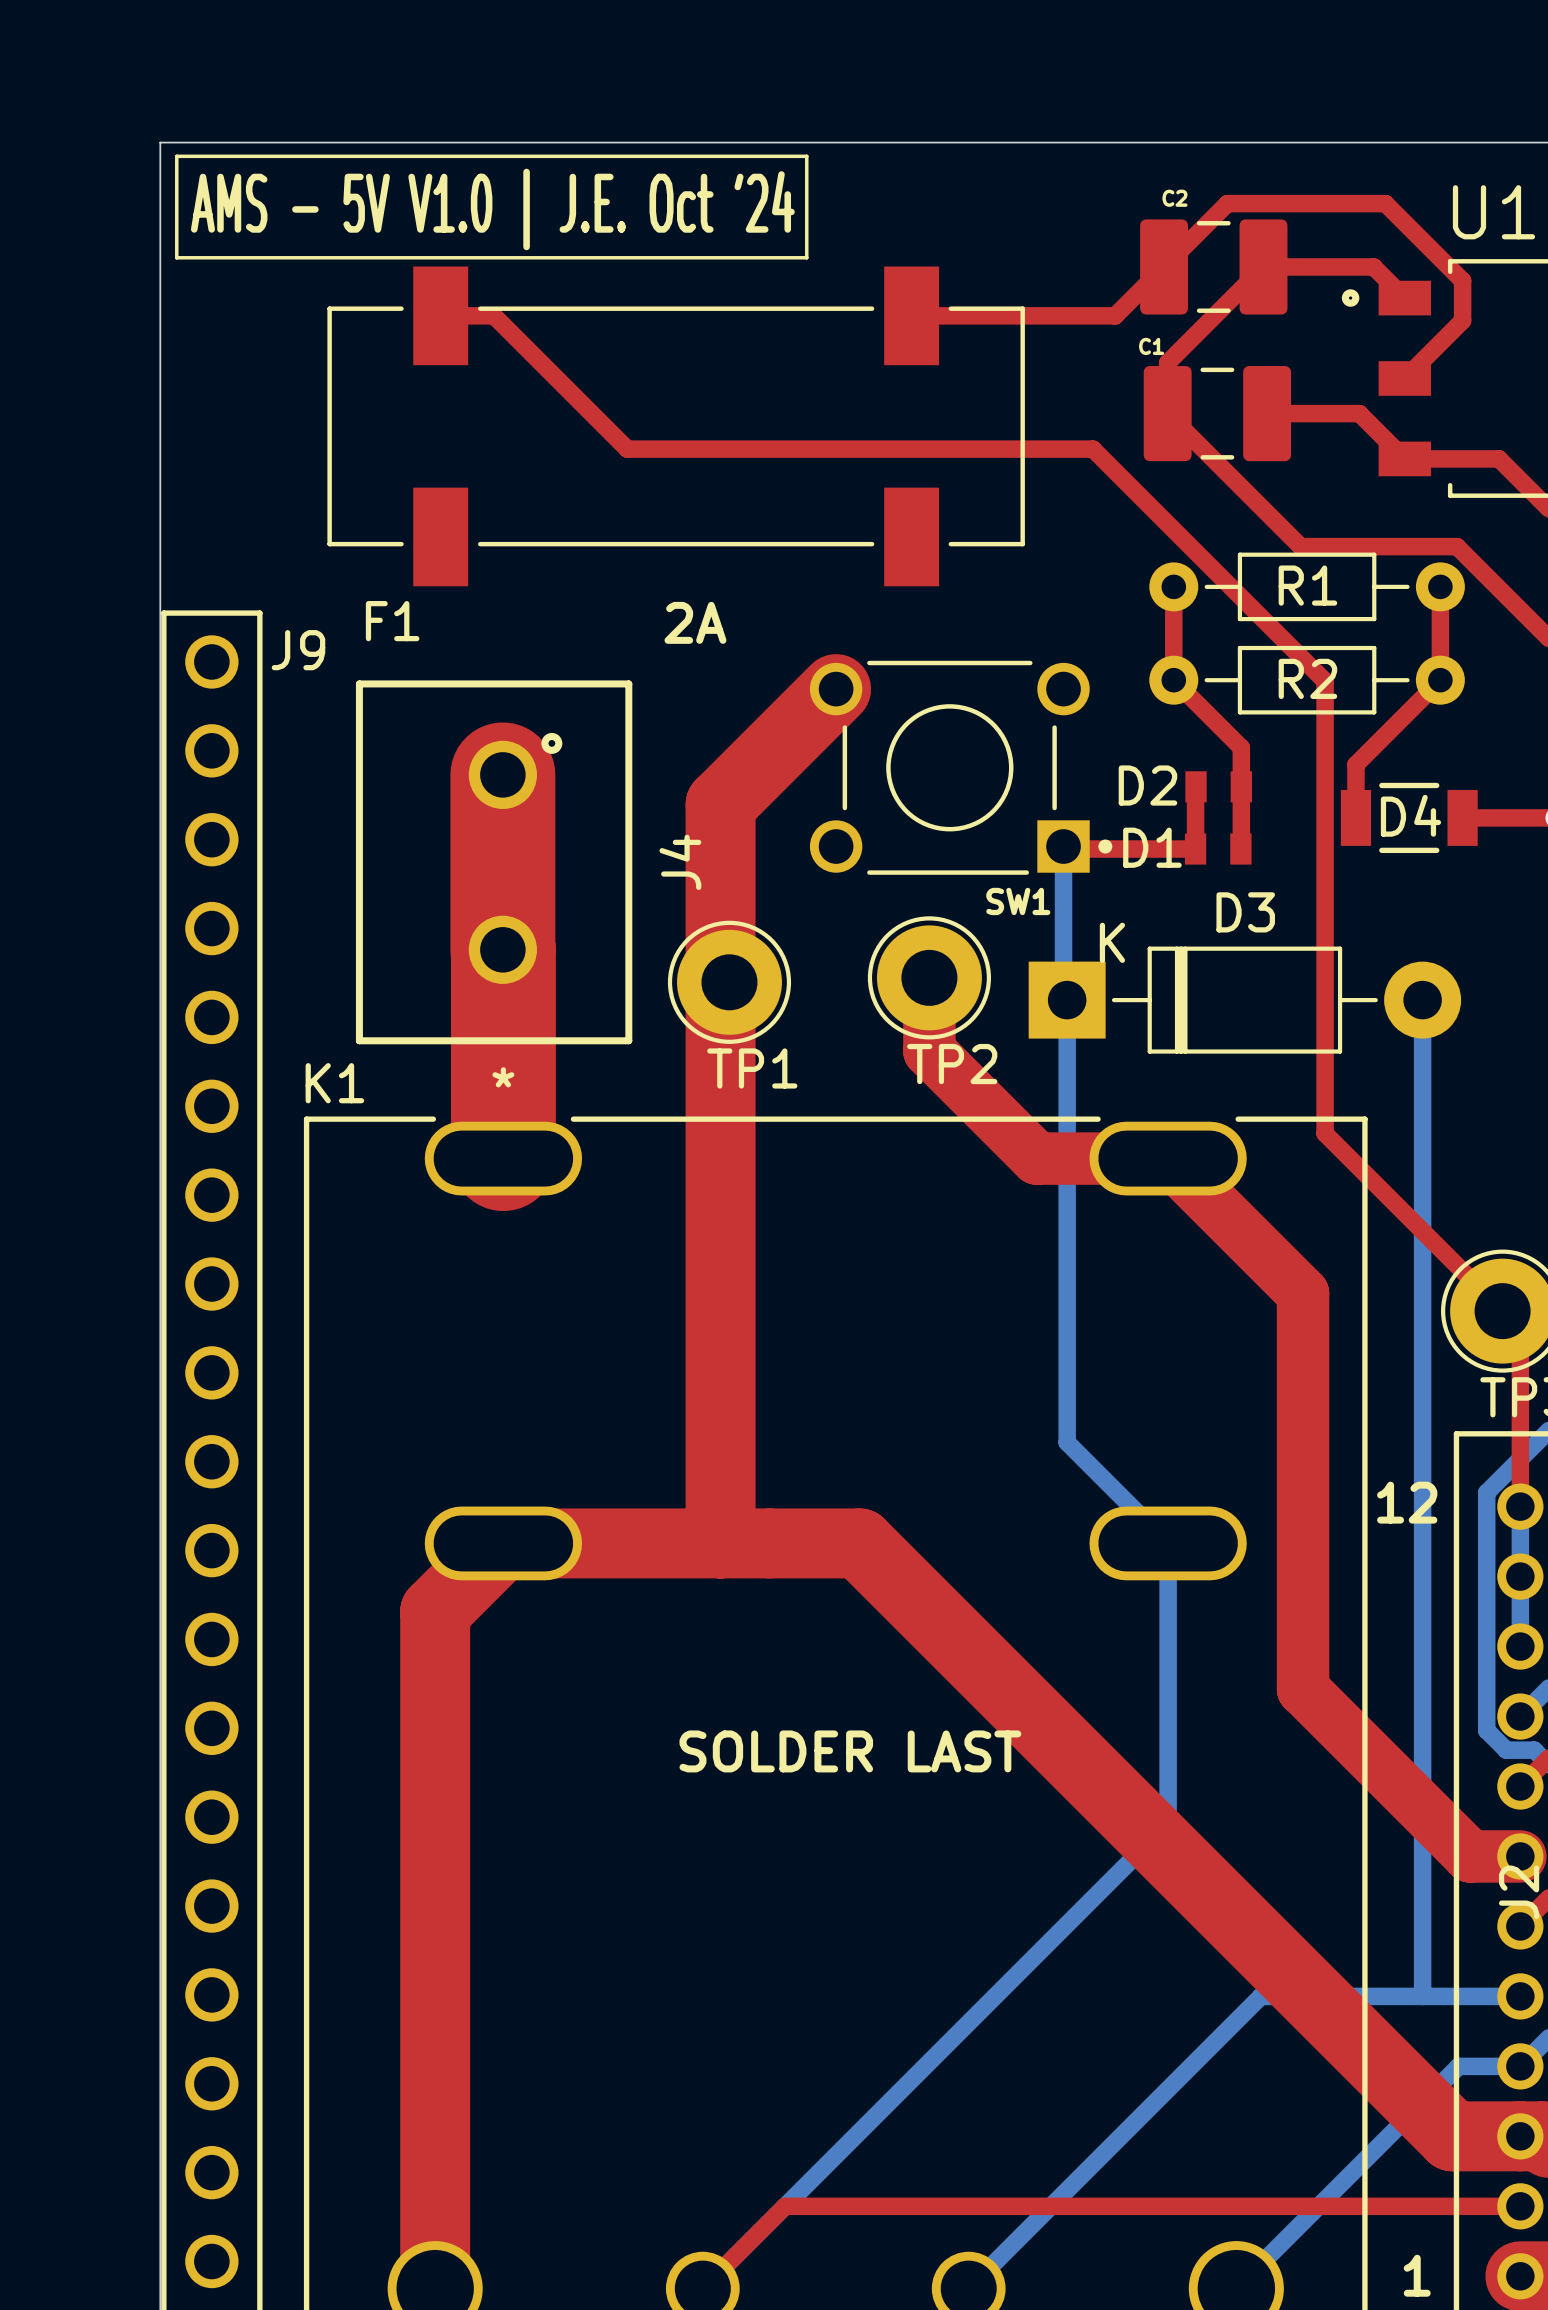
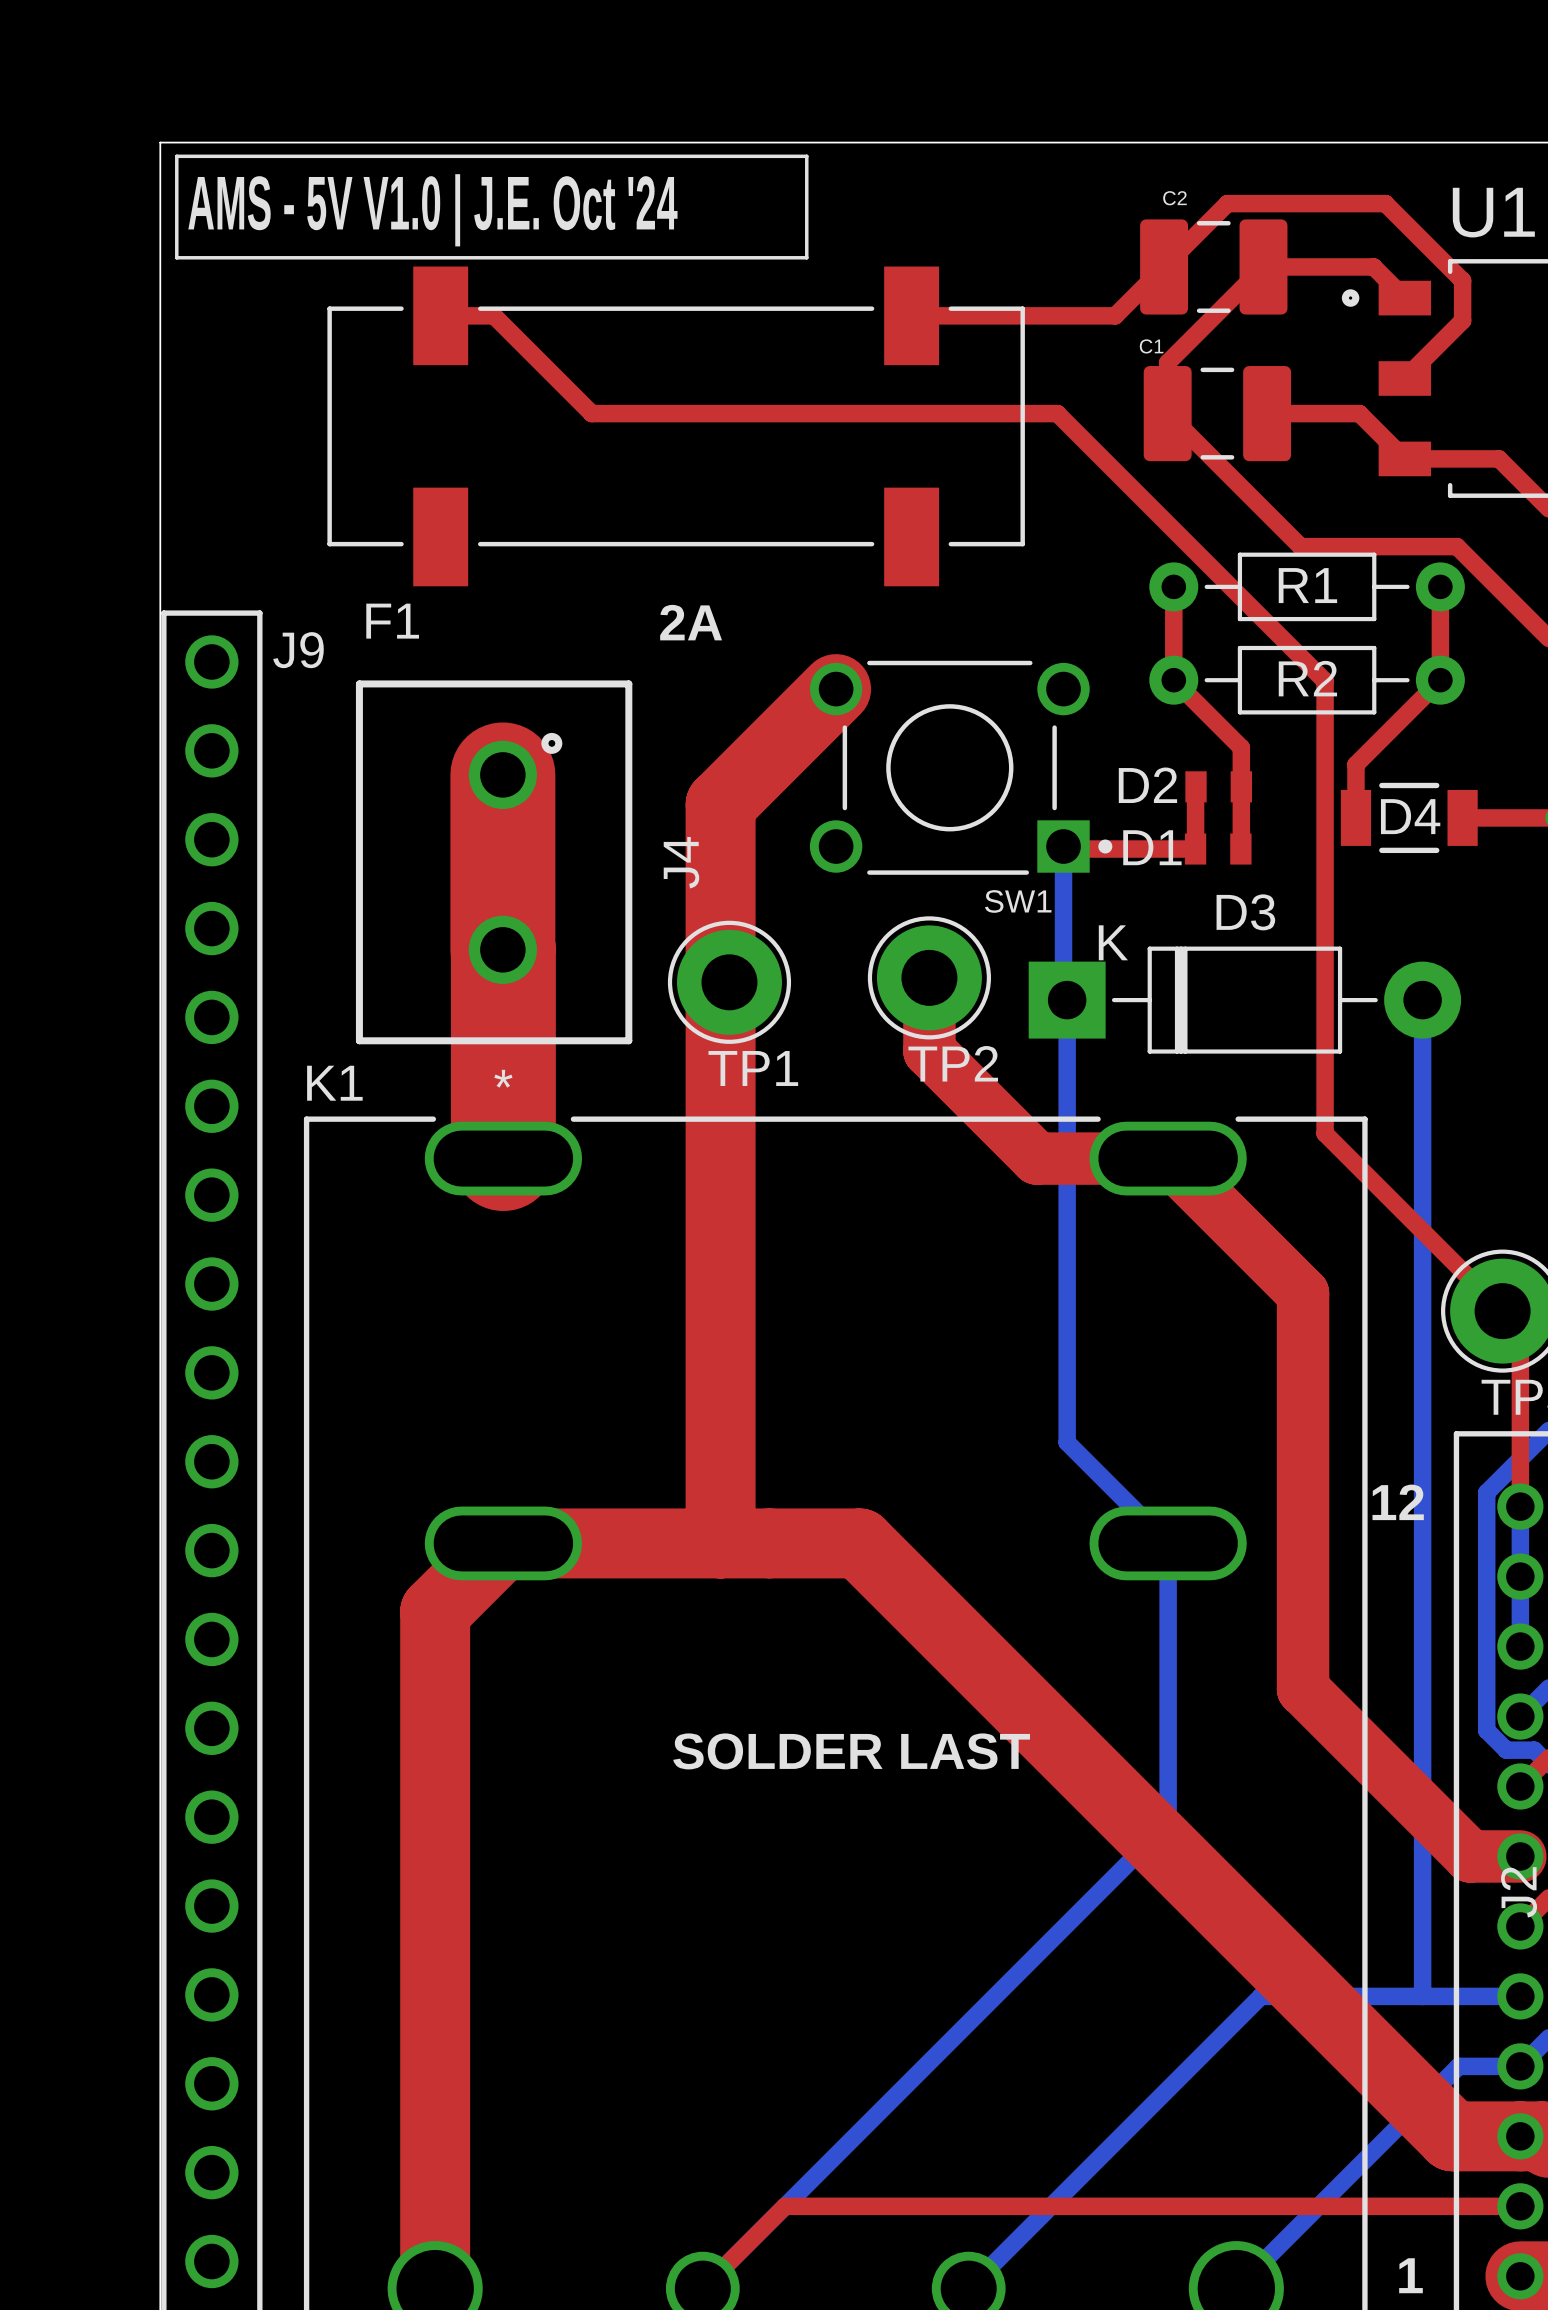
top track: (591, 413) (627, 449) (1093, 449) -> (591, 413) (1057, 413) (1093, 449)

